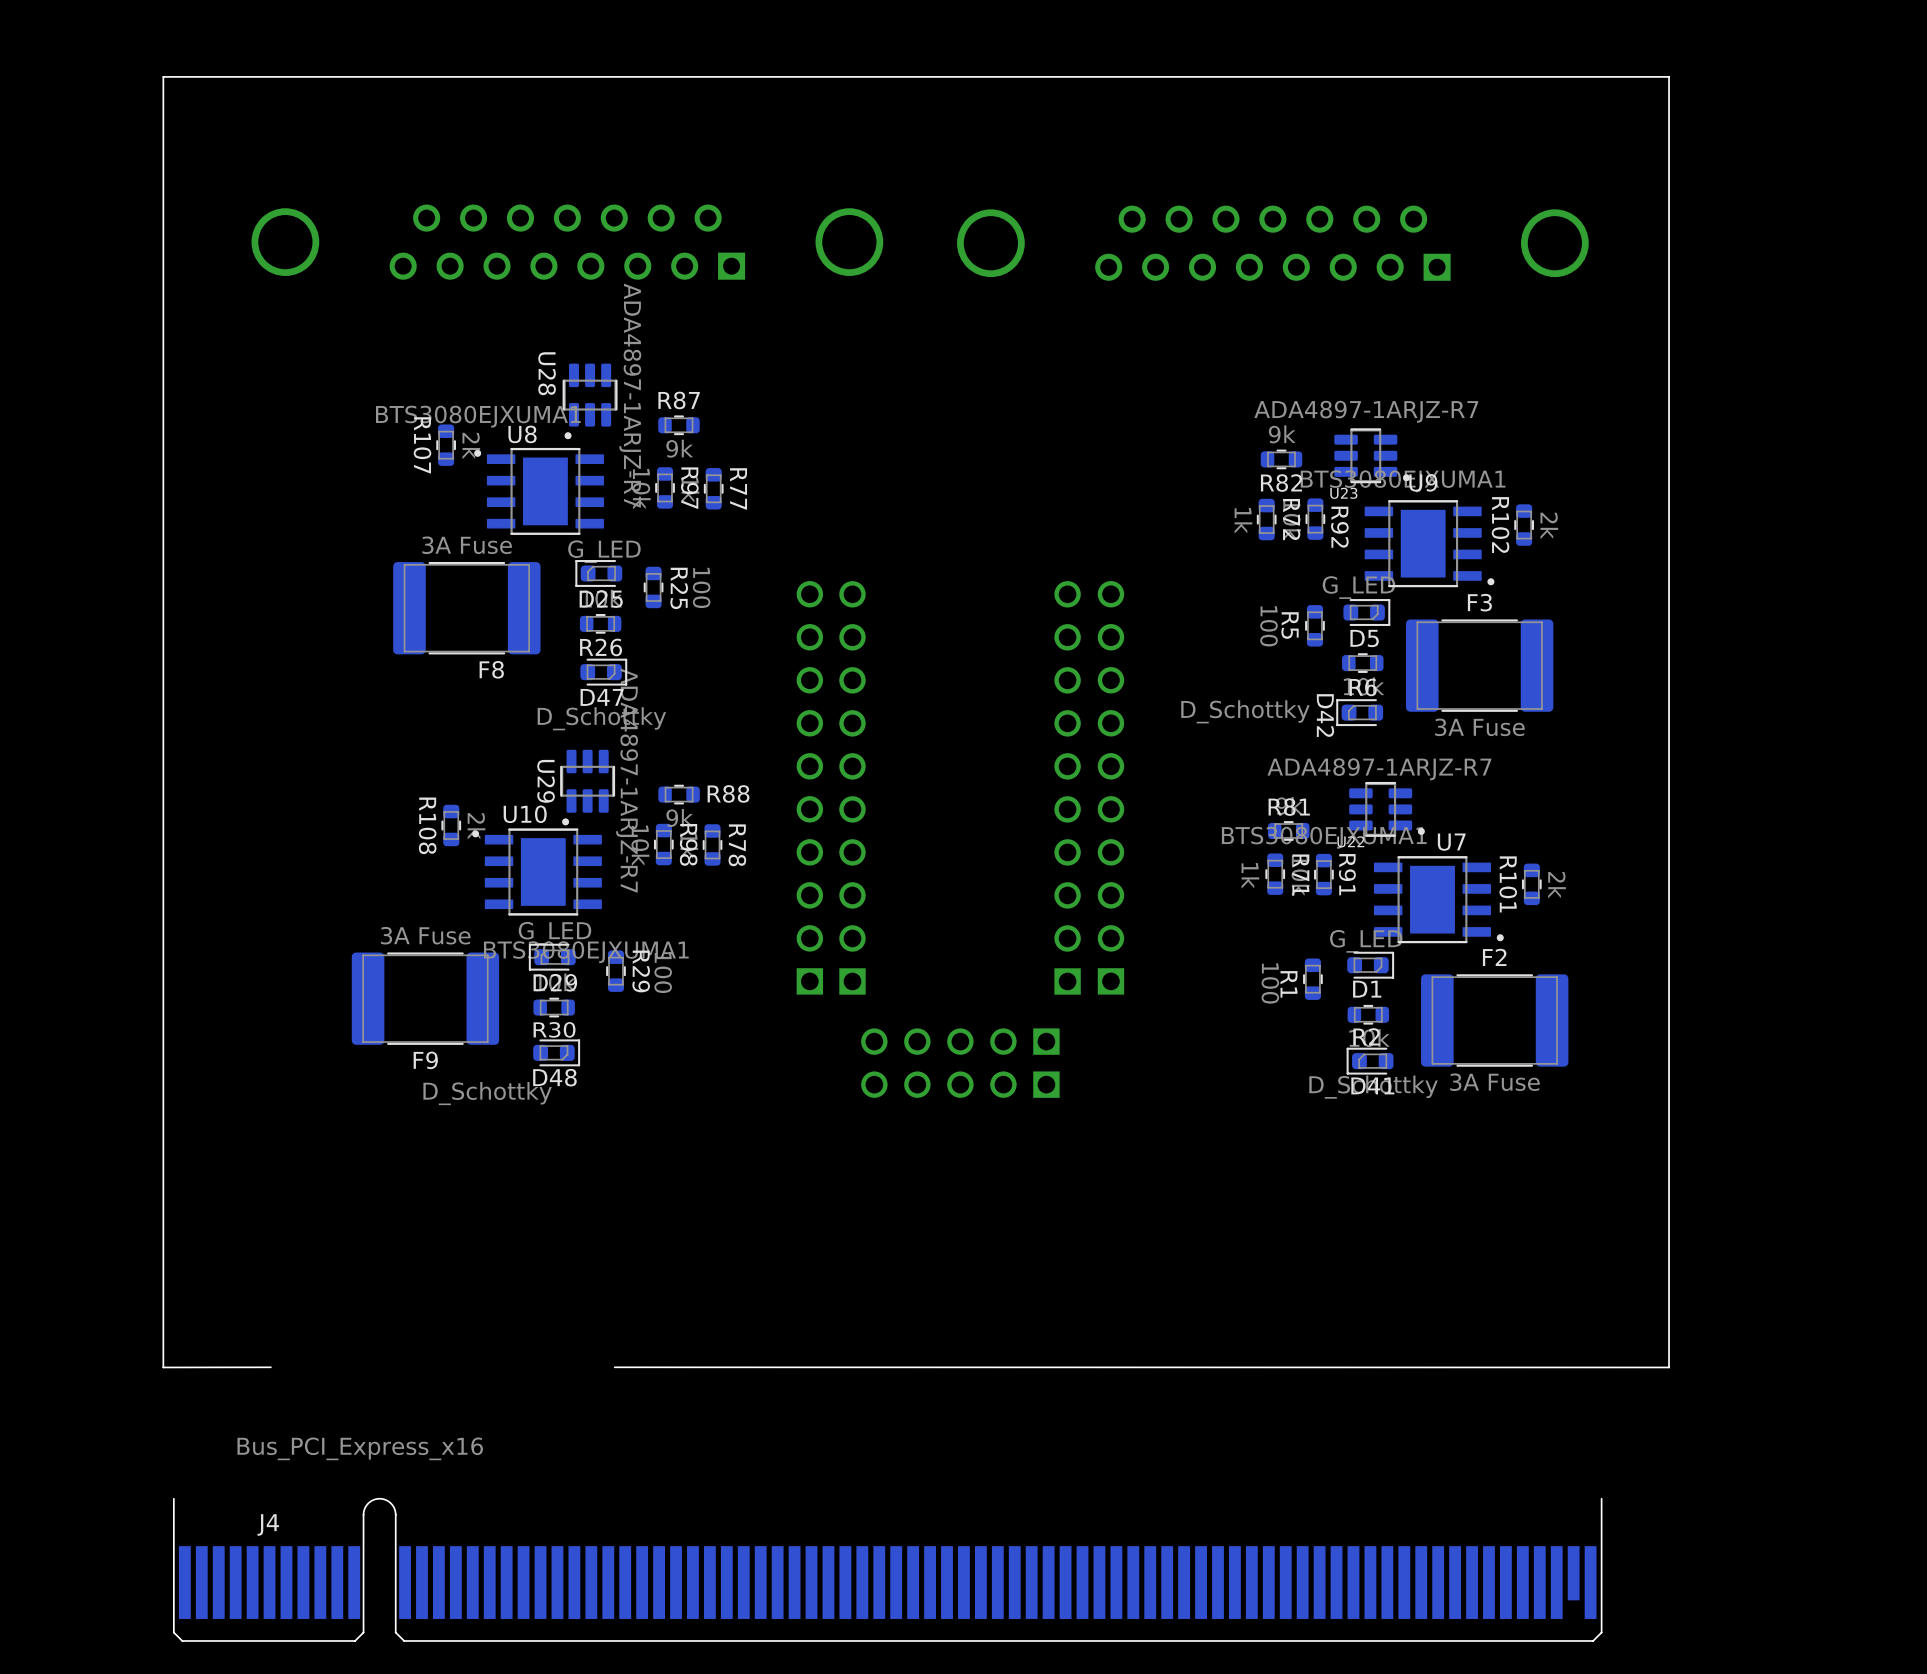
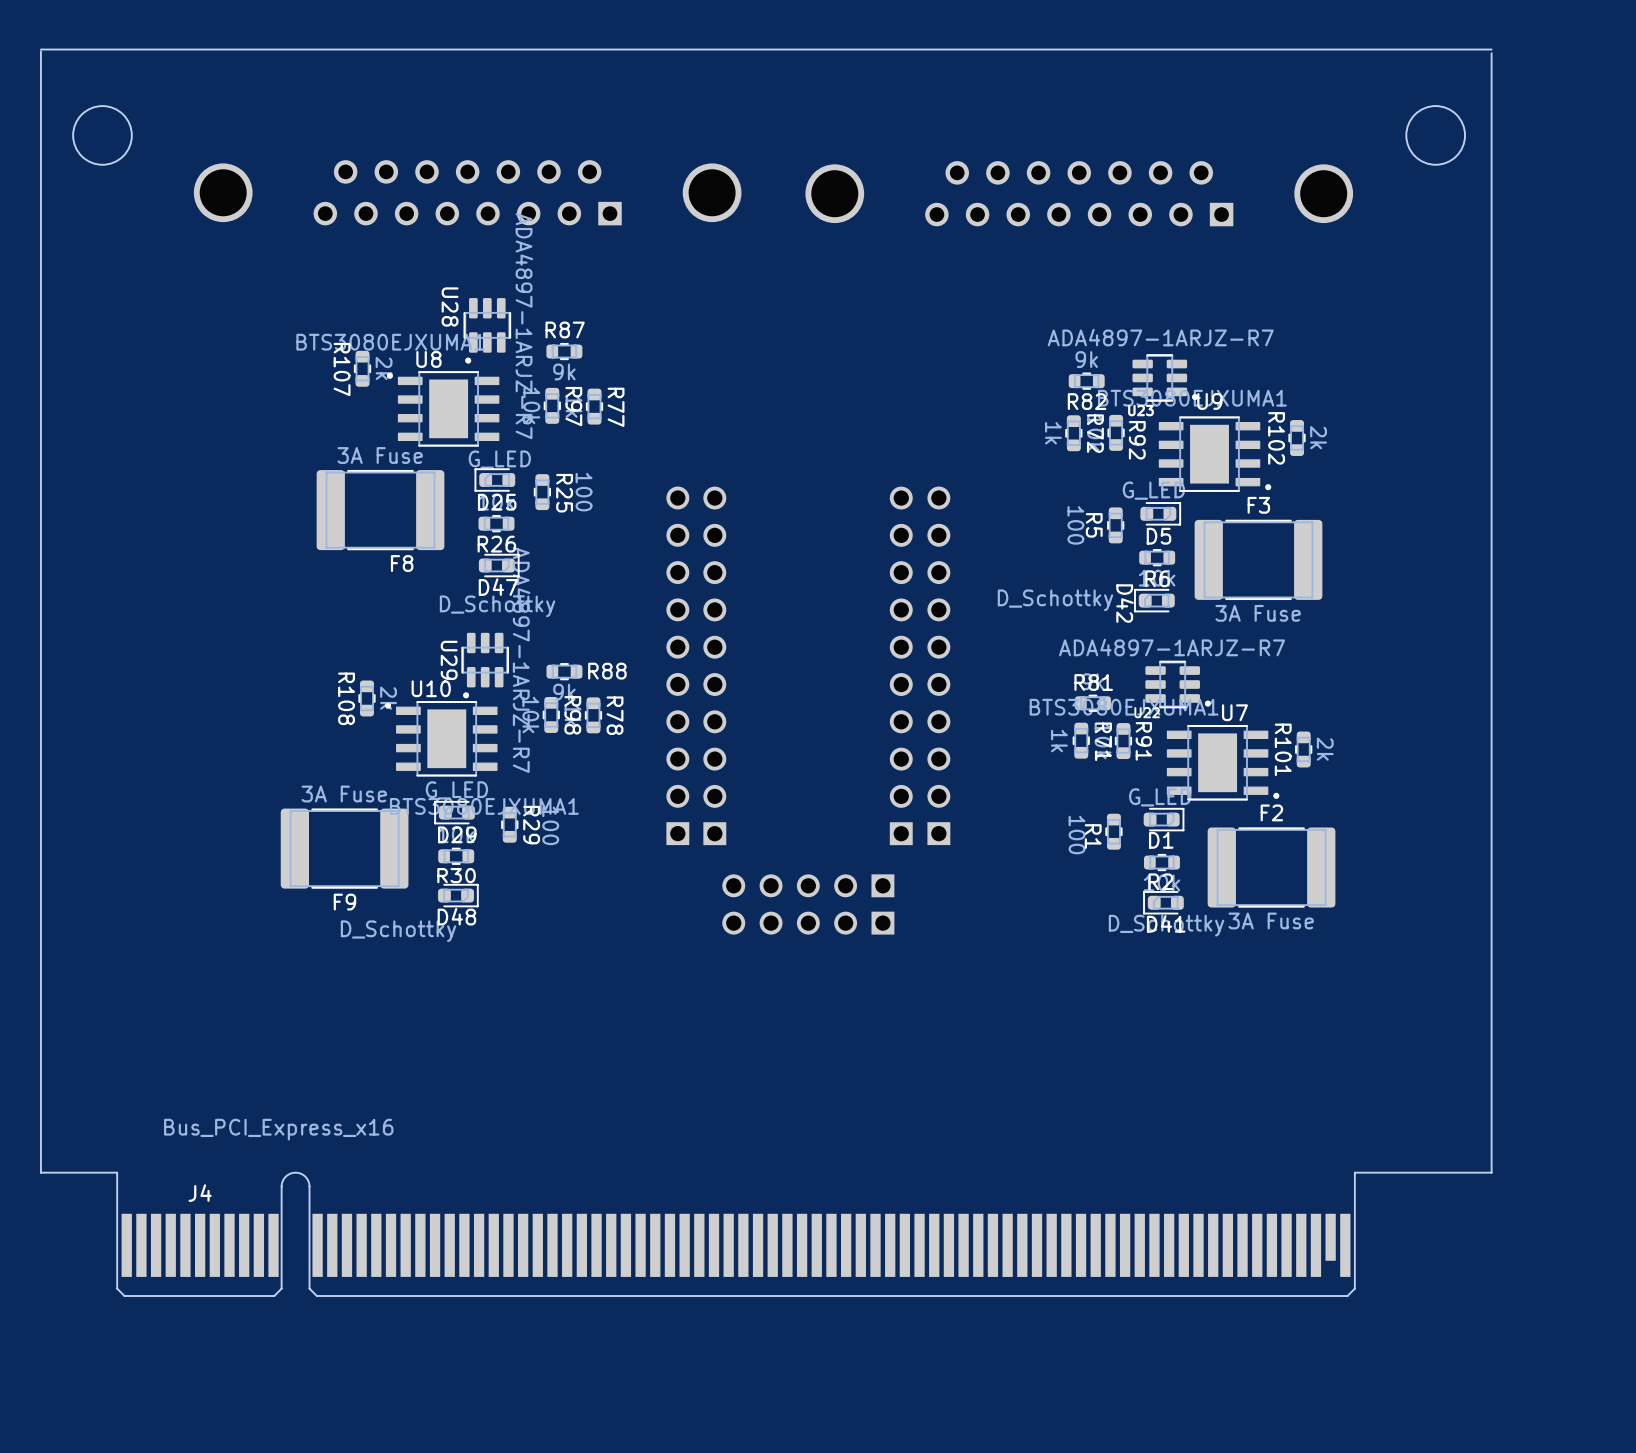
board edge: (163, 76) (163, 1367) (270, 1367) -> (117, 49) (40, 49)
board edge: (1669, 76) (1669, 1367) (614, 1367) -> (1422, 49) (1491, 49)
board edge: none -> (40, 51) (40, 1172) (117, 1172)
board edge: none -> (1491, 53) (1491, 1172) (1354, 1172)
round board edge: none -> [72, 105, 133, 166]
round board edge: none -> [1405, 105, 1466, 166]
J4 position: (887, 1569) -> (736, 1234)

